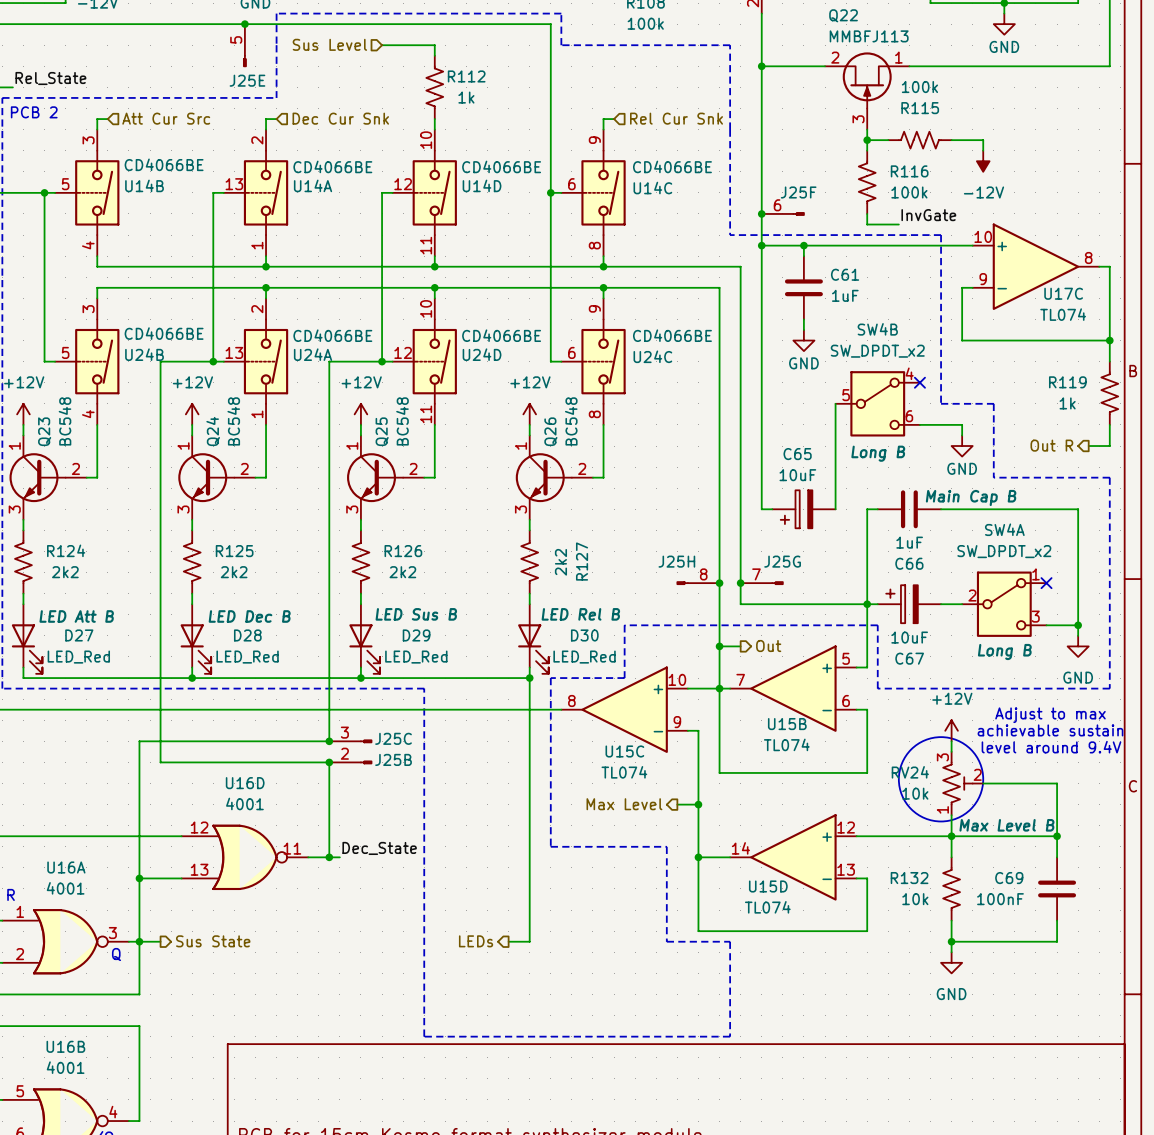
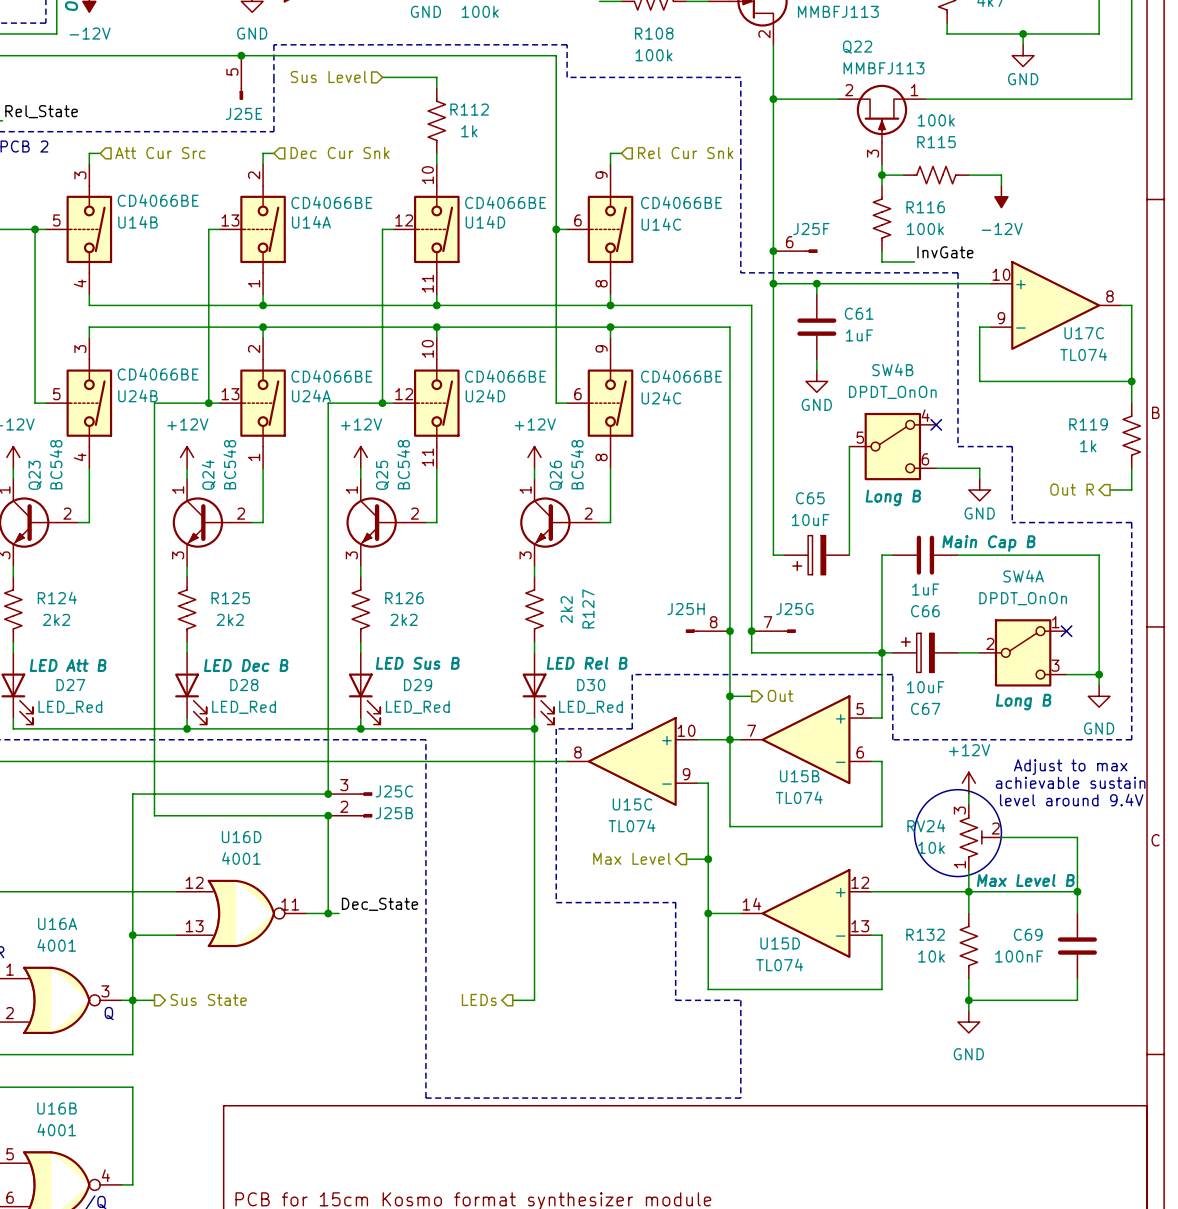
SW4B value: SW_DPDT_x2 (877, 351) -> DPDT_OnOn (892, 392)
SW4A value: SW_DPDT_x2 (1004, 551) -> DPDT_OnOn (1023, 598)

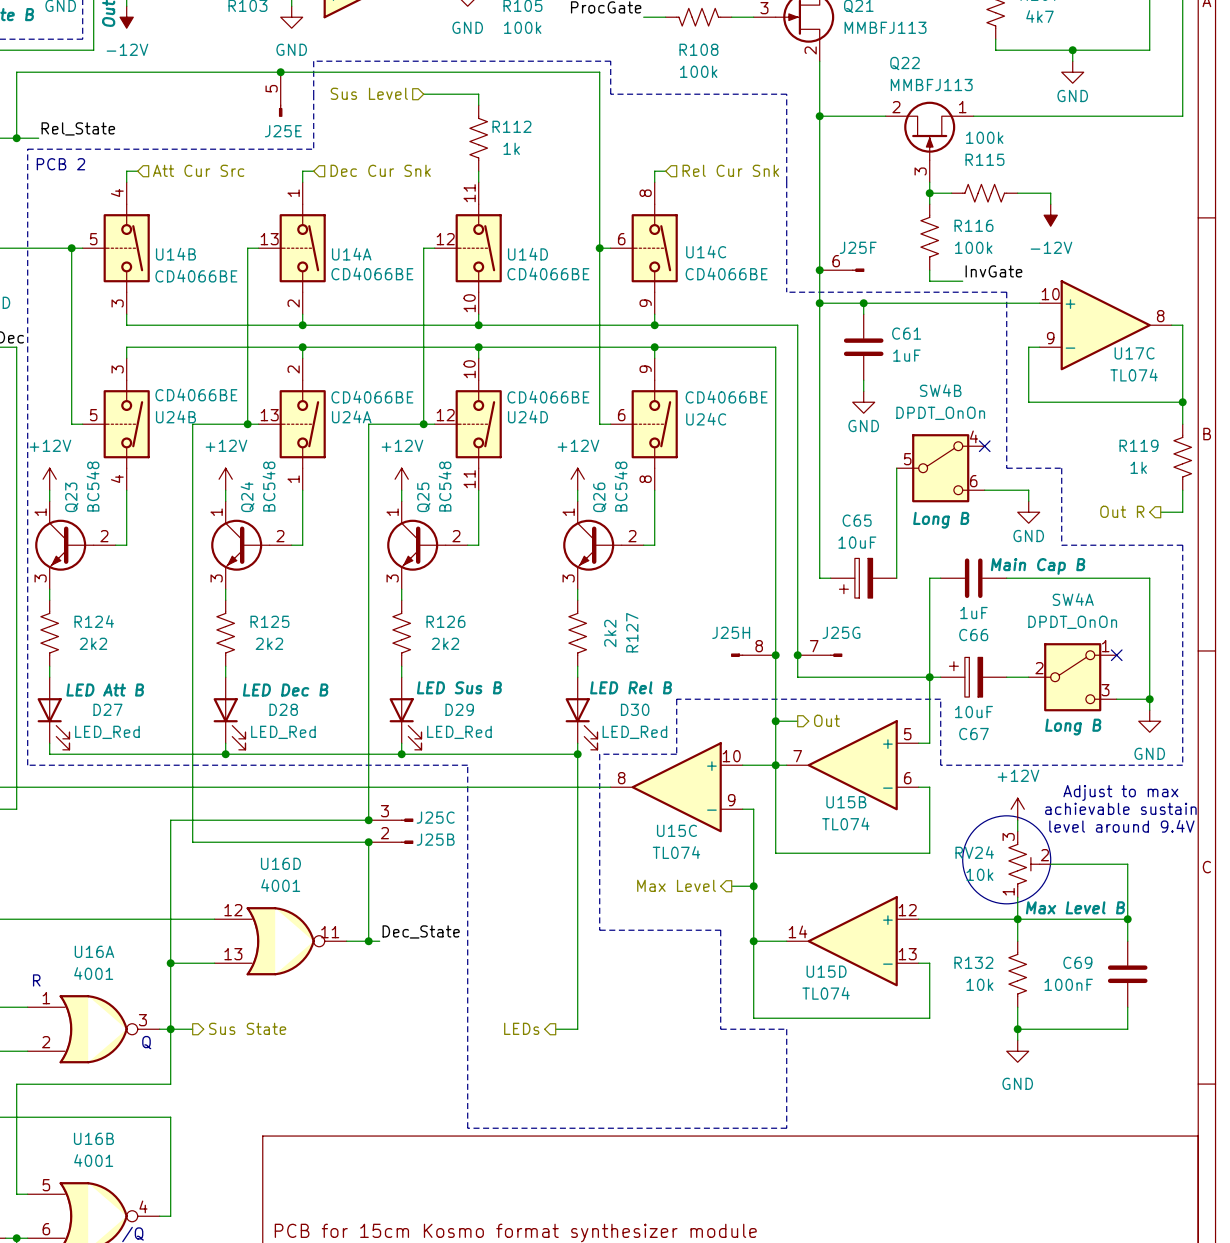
U14B flip: as is (89, 229) -> up-down (126, 248)
U14A flip: as is (263, 229) -> up-down (302, 248)
U14D flip: as is (436, 229) -> up-down (478, 248)
U14C flip: as is (610, 229) -> up-down (654, 248)

